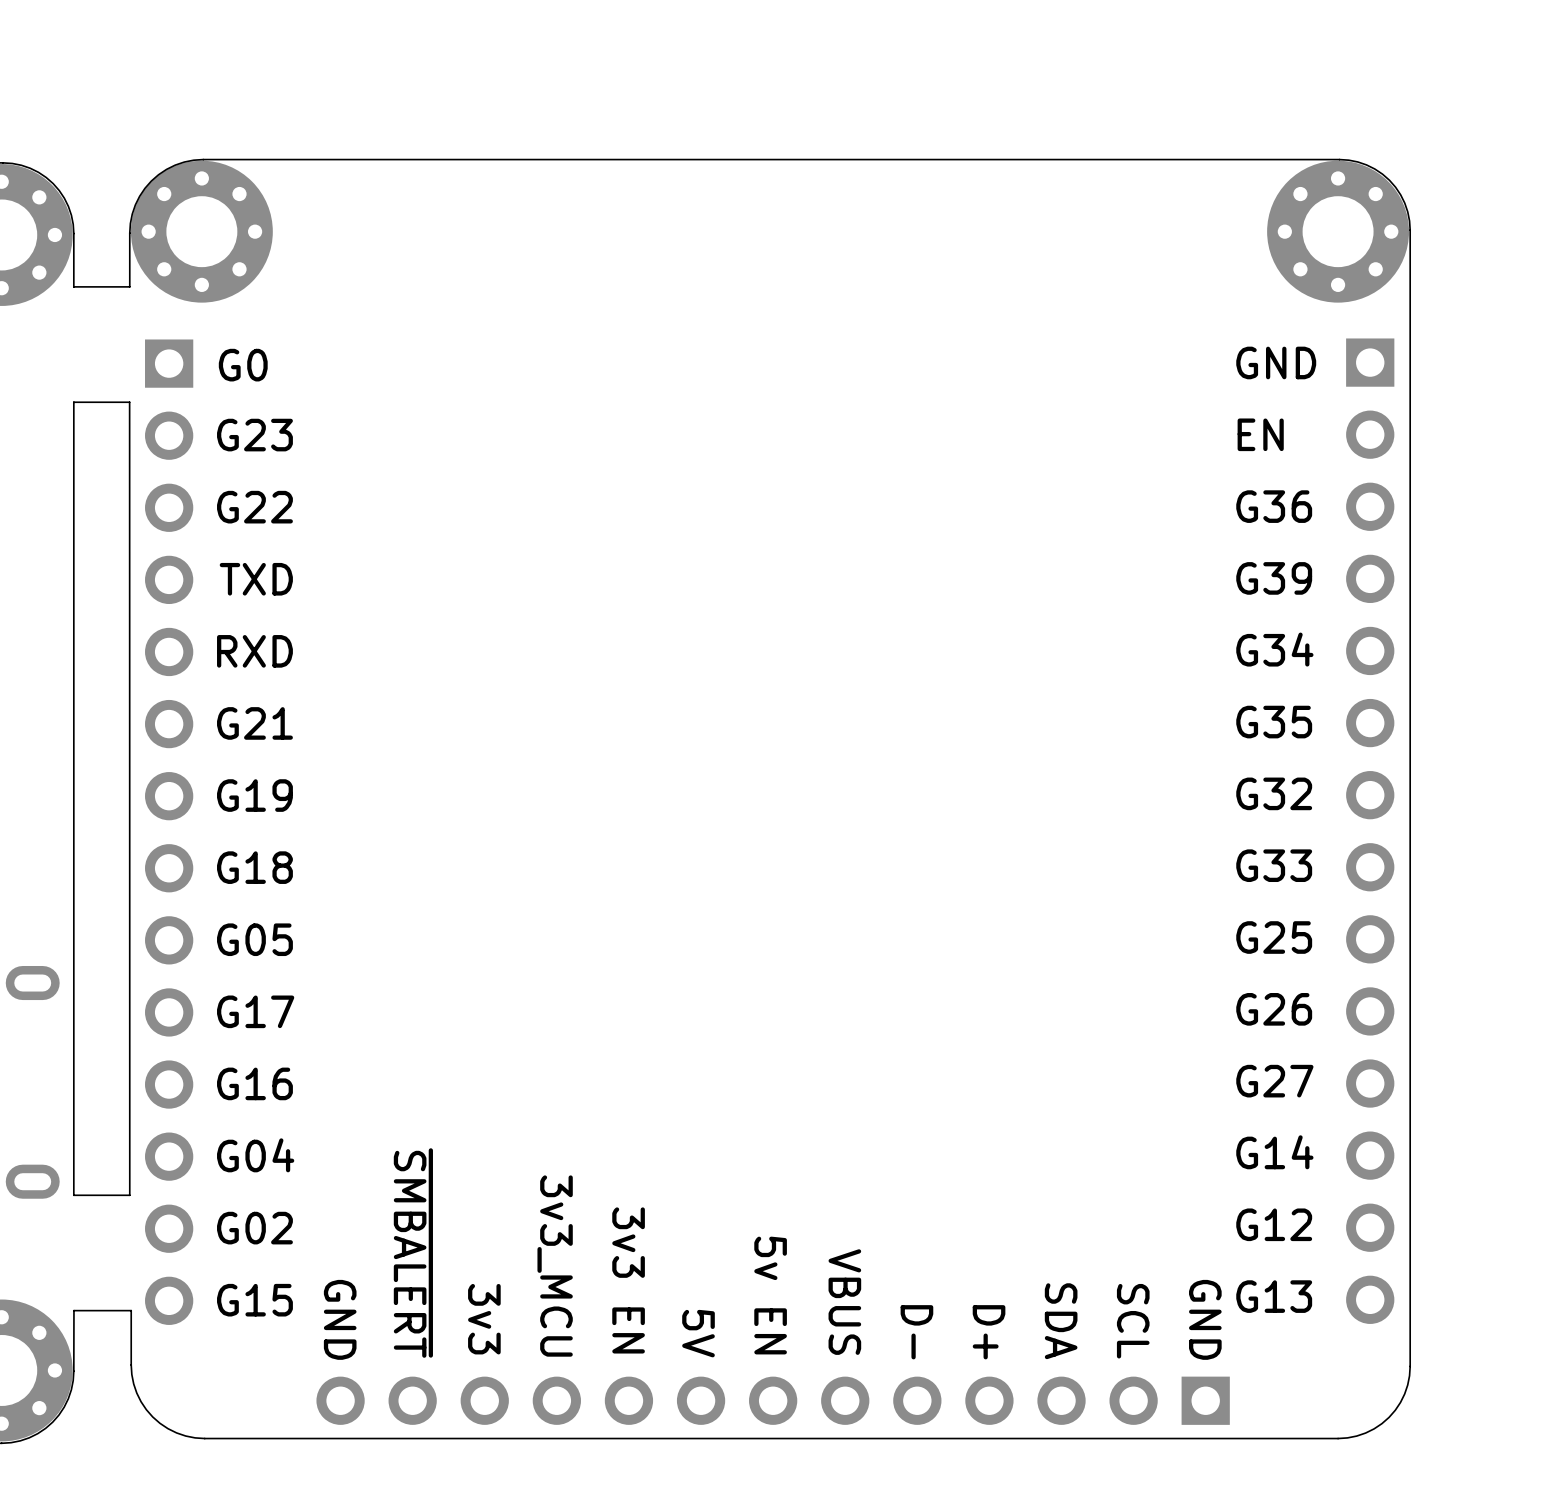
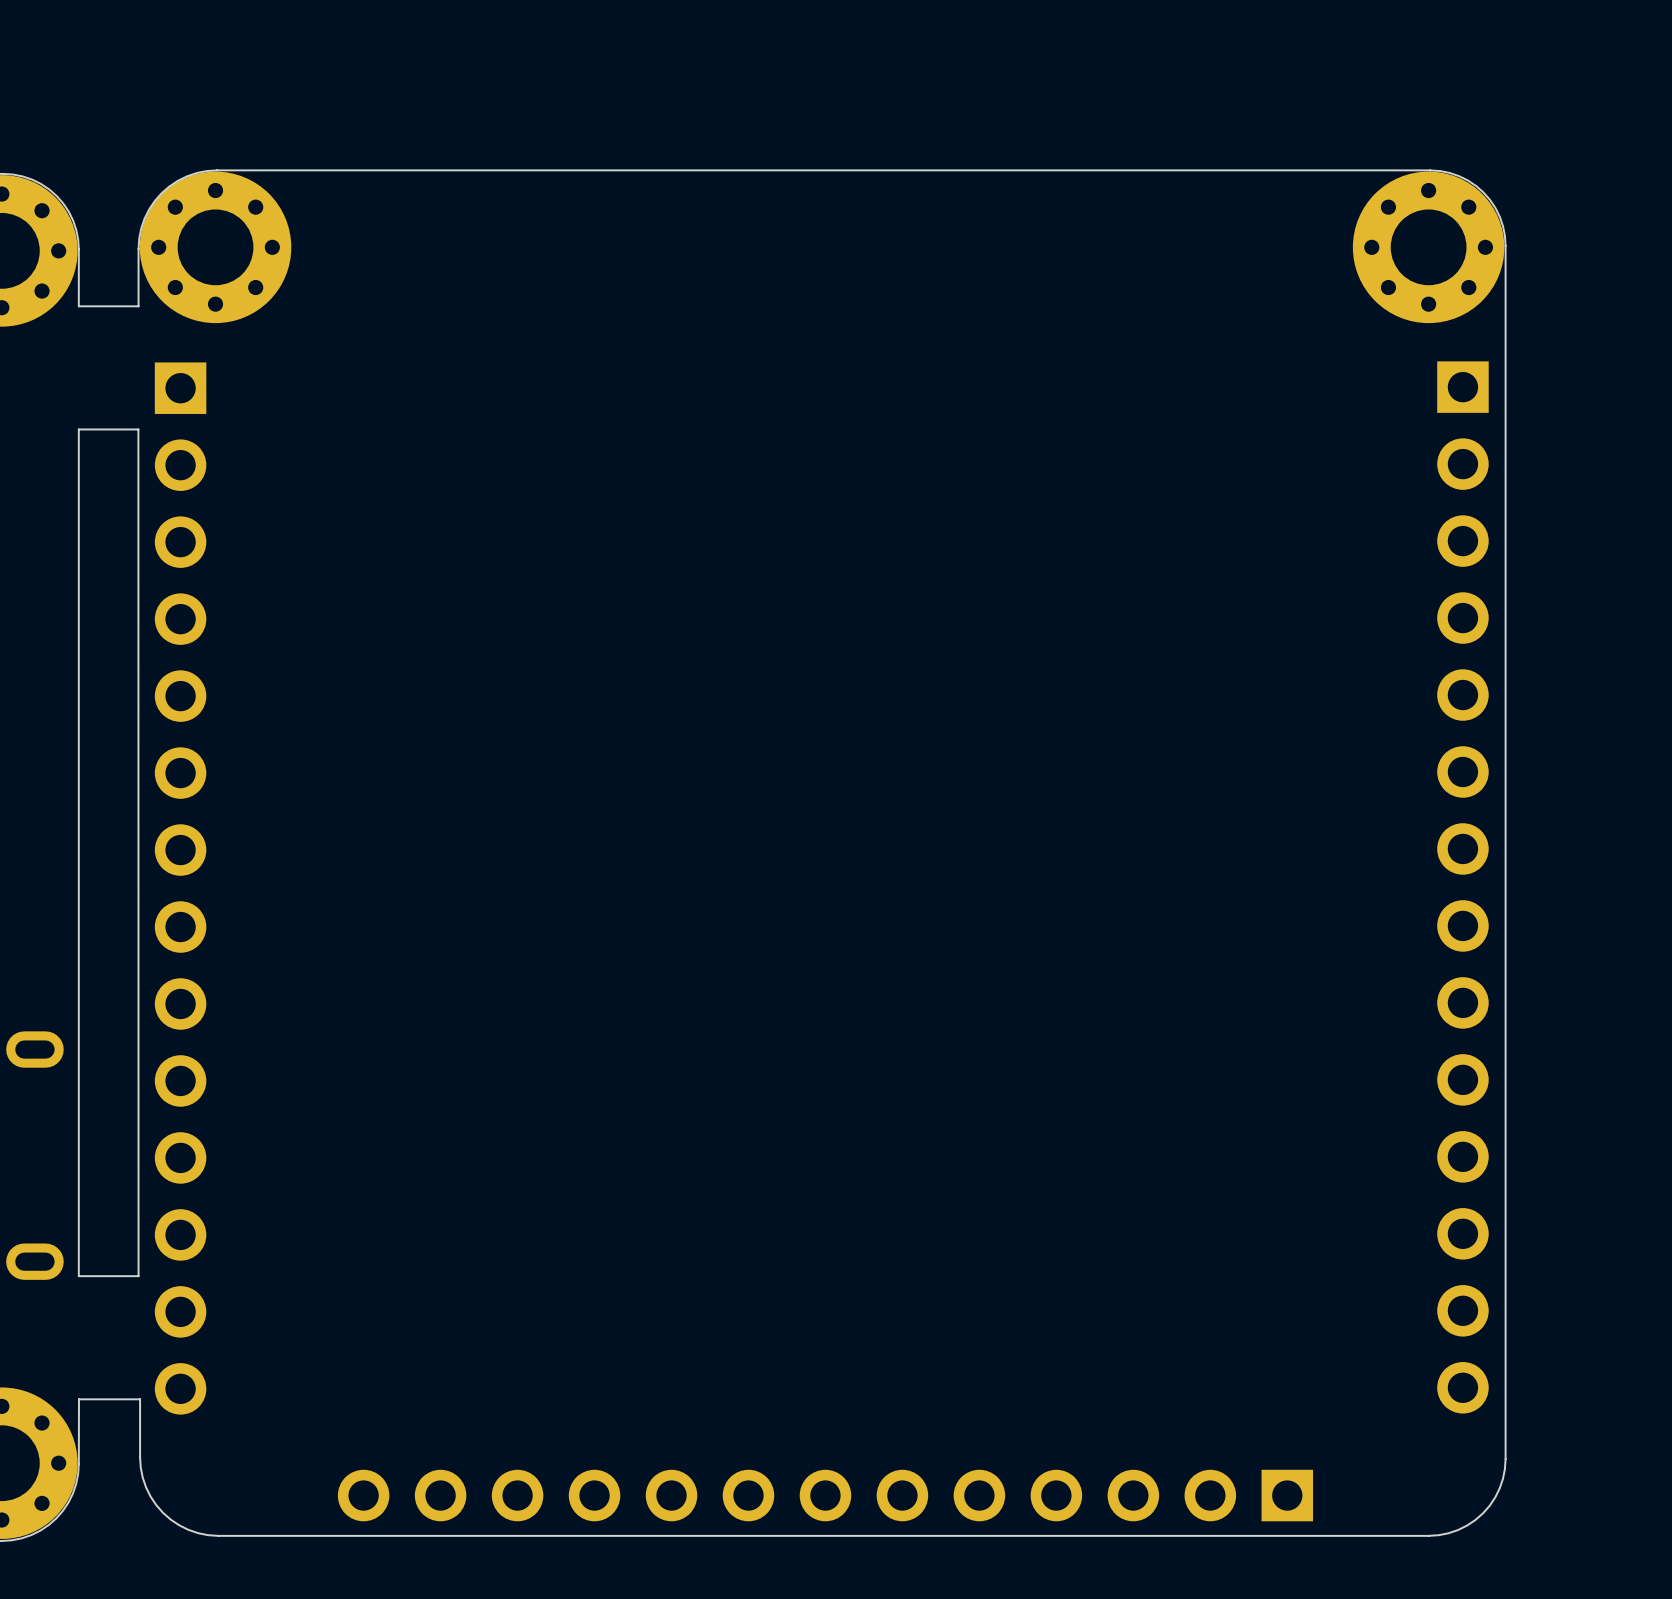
text: GND (1276, 362) -> none
text: G0 (243, 365) -> none
text: EN (1260, 434) -> none
text: G23 (254, 435) -> none
text: G36 (1274, 506) -> none
text: G22 (254, 507) -> none
text: G39 (1274, 578) -> none
text: TXD (256, 579) -> none
text: G34 (1274, 649) -> none
text: RXD (254, 651) -> none
text: G35 (1274, 722) -> none
text: G21 (254, 723) -> none
text: G32 (1274, 793) -> none
text: G19 (254, 795) -> none
text: G33 (1274, 865) -> none
text: G18 (254, 867) -> none
text: G25 (1274, 937) -> none
text: G05 (254, 939) -> none
text: G26 (1274, 1009) -> none
text: G17 (255, 1011) -> none
text: G27 (1274, 1081) -> none
text: G16 (254, 1083) -> none
text: G14 (1274, 1152) -> none
text: G04 (255, 1155) -> none
text: G12 (1274, 1224) -> none
text: G02 (254, 1228) -> none
text: ~{SMBALERT} (413, 1253) -> none
text: 3v3_MCU (555, 1266) -> none
text: 3v3 EN (628, 1280) -> none
text: 5v EN (770, 1295) -> none
text: G13 (1274, 1296) -> none
text: G15 (254, 1300) -> none
text: VBUS (844, 1302) -> none
text: GND (340, 1319) -> none
text: 3v3 (484, 1319) -> none
text: GND (1205, 1319) -> none
text: SDA (1061, 1321) -> none
text: SCL (1133, 1321) -> none
text: D- (916, 1332) -> none
text: D+ (989, 1332) -> none
text: 5V (698, 1333) -> none

